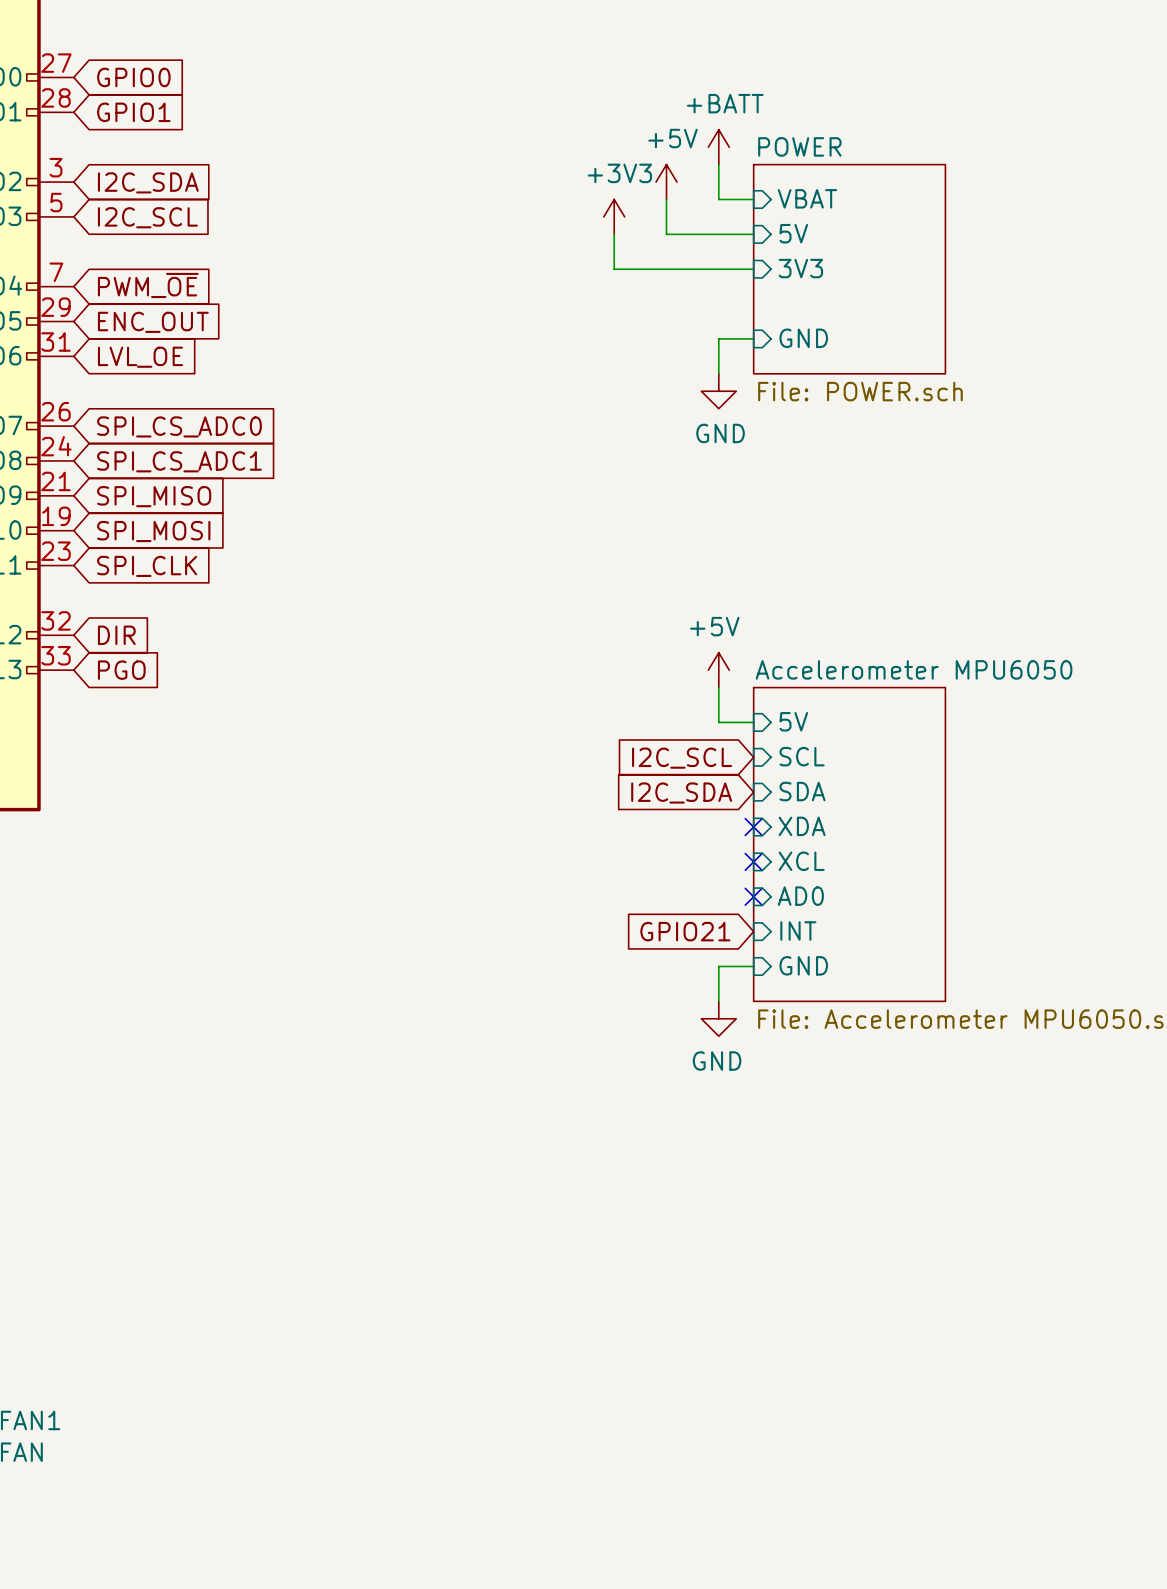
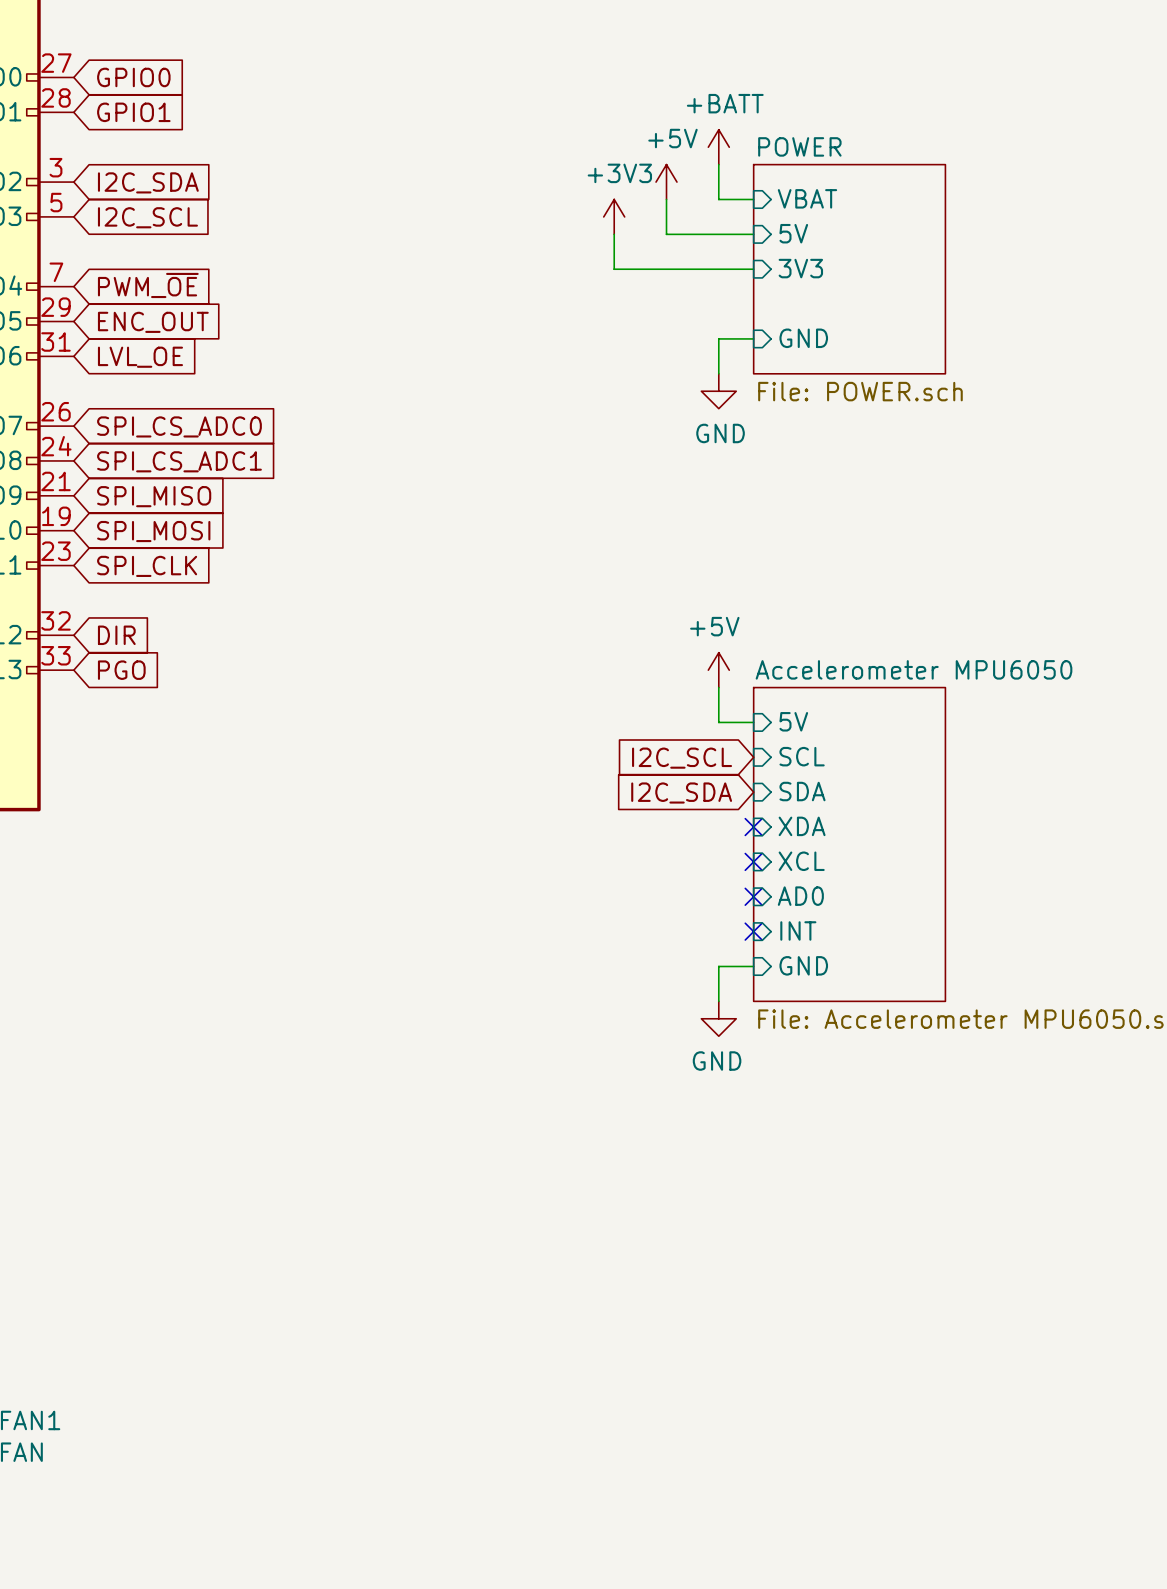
global label: GPIO21 (685, 931) -> none
no-connect mark: none -> (753, 931)

